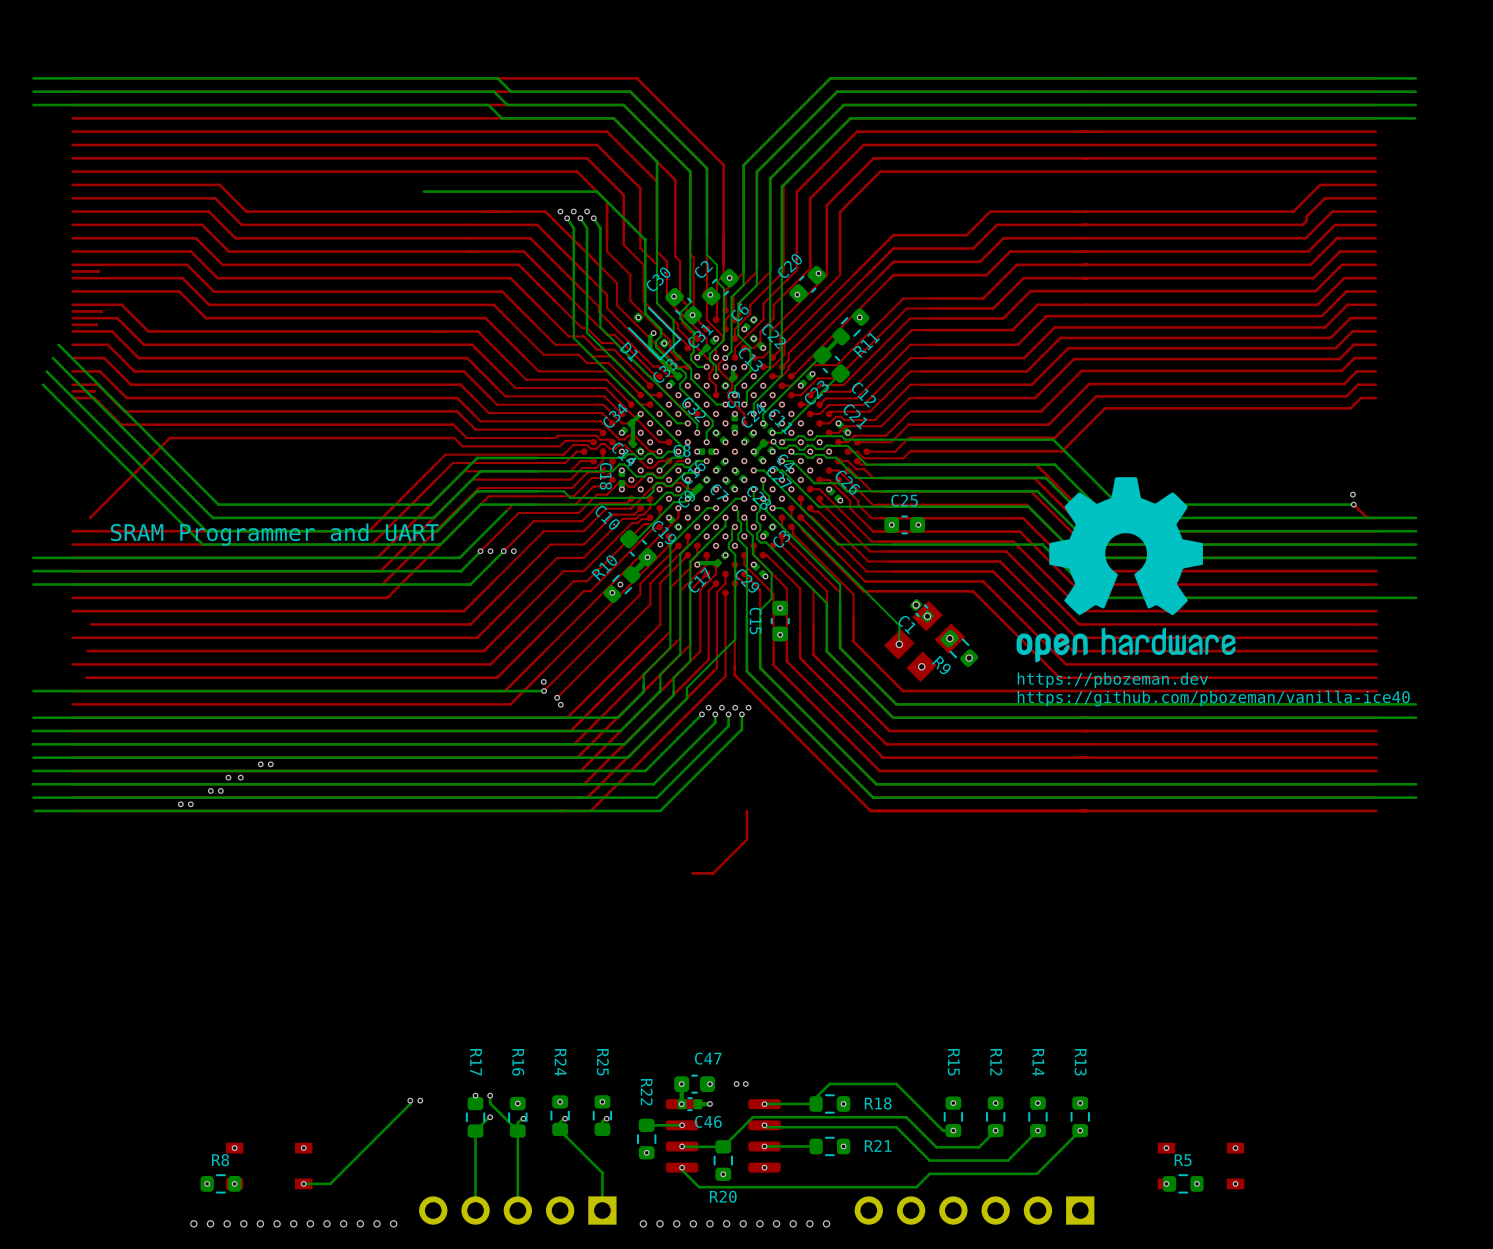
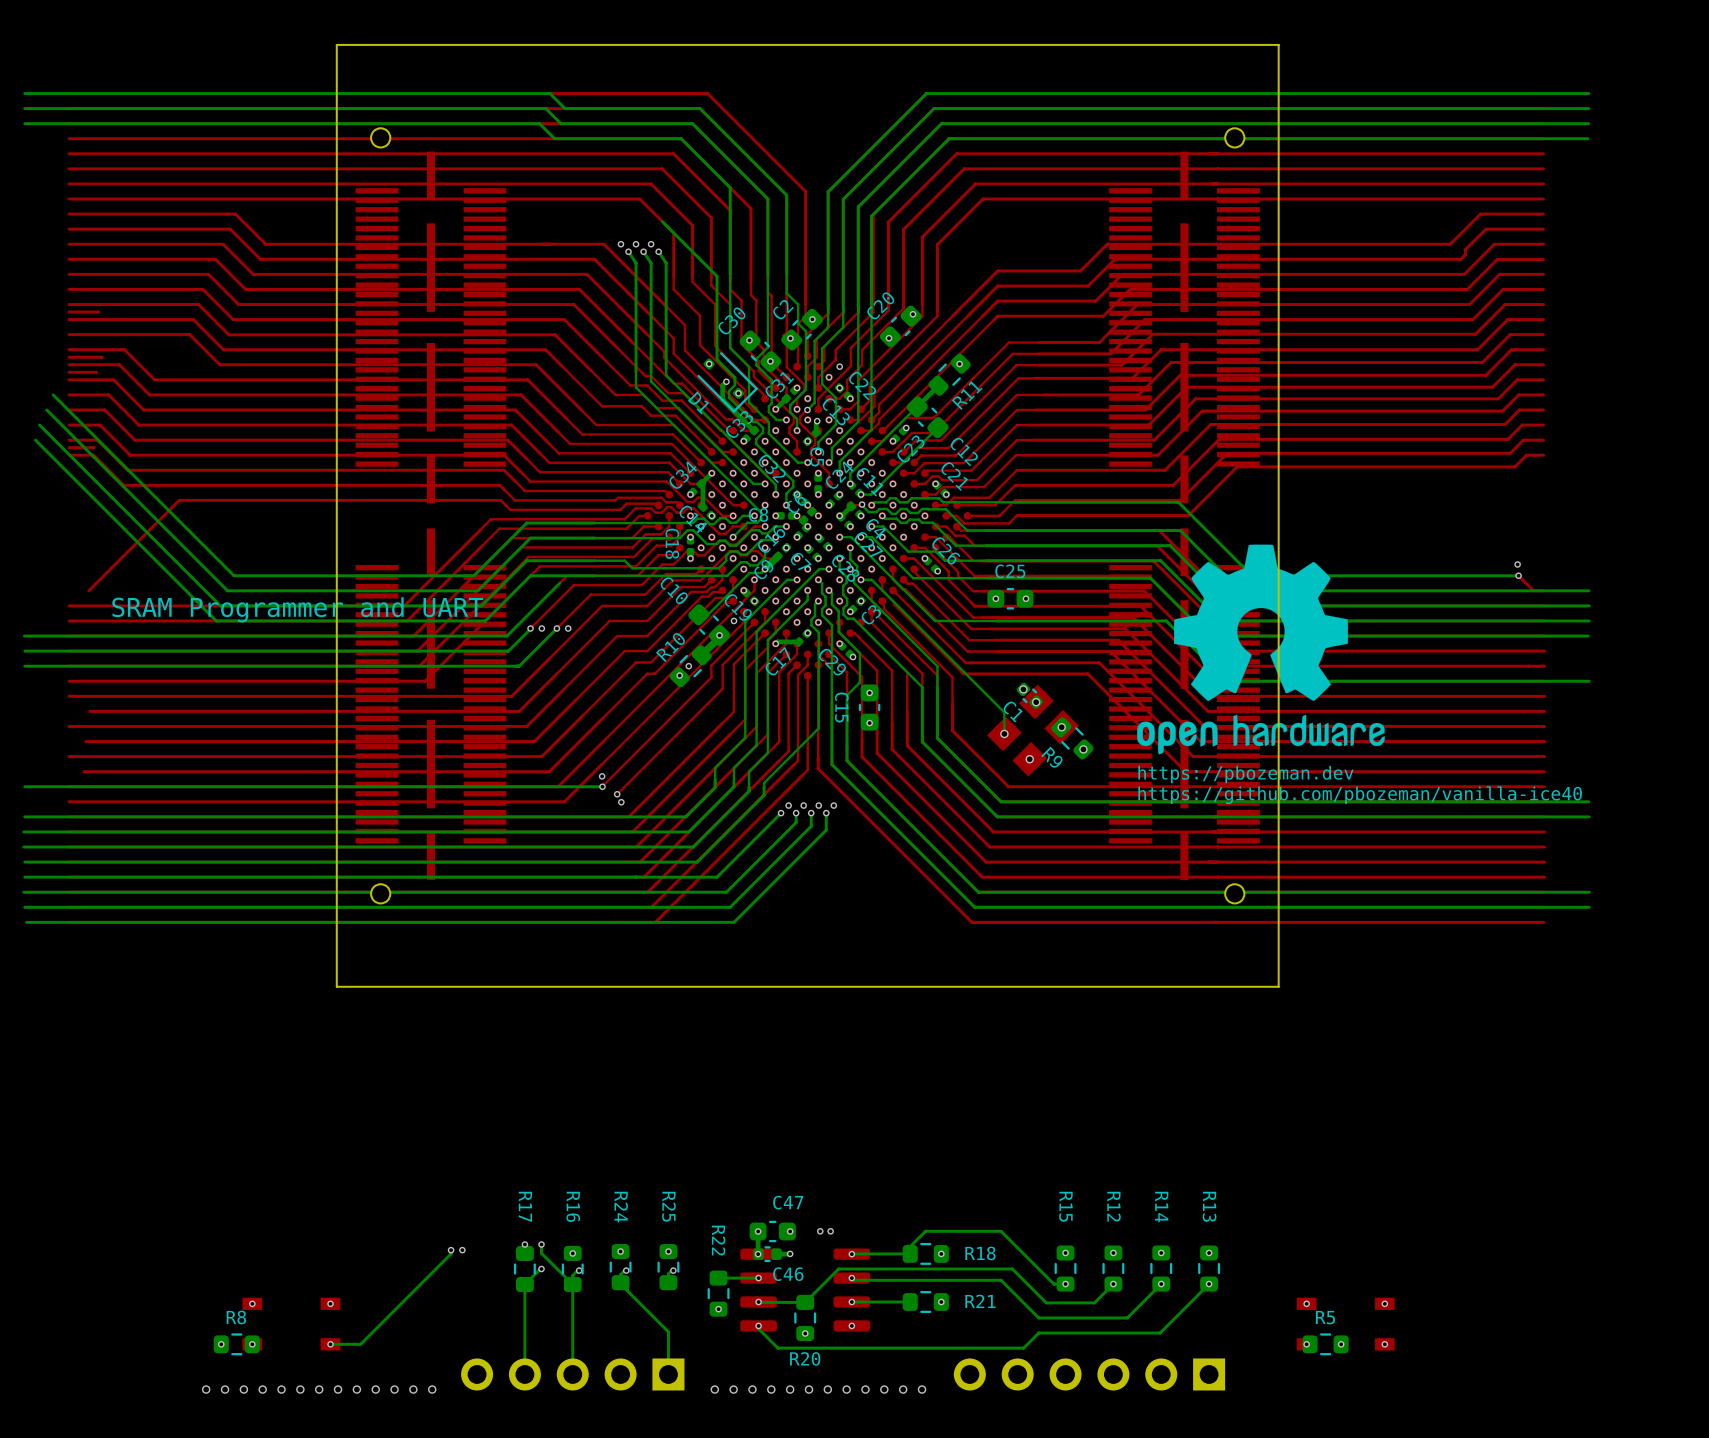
board edge: none -> (1278, 44) (336, 44) (336, 986) (1278, 986) (1278, 44)
bottom track: (597, 191) (423, 191) -> none
C6 position: (749, 323) -> (807, 515)
part: none -> (430, 515)
part: none -> (1184, 515)
via: (260, 764) -> none
via: (270, 764) -> none
via: (228, 777) -> none
via: (240, 777) -> none
via: (210, 790) -> none
via: (220, 790) -> none
via: (180, 804) -> none
via: (190, 804) -> none
top track: (746, 810) (746, 839) (713, 873) (692, 873) -> none

